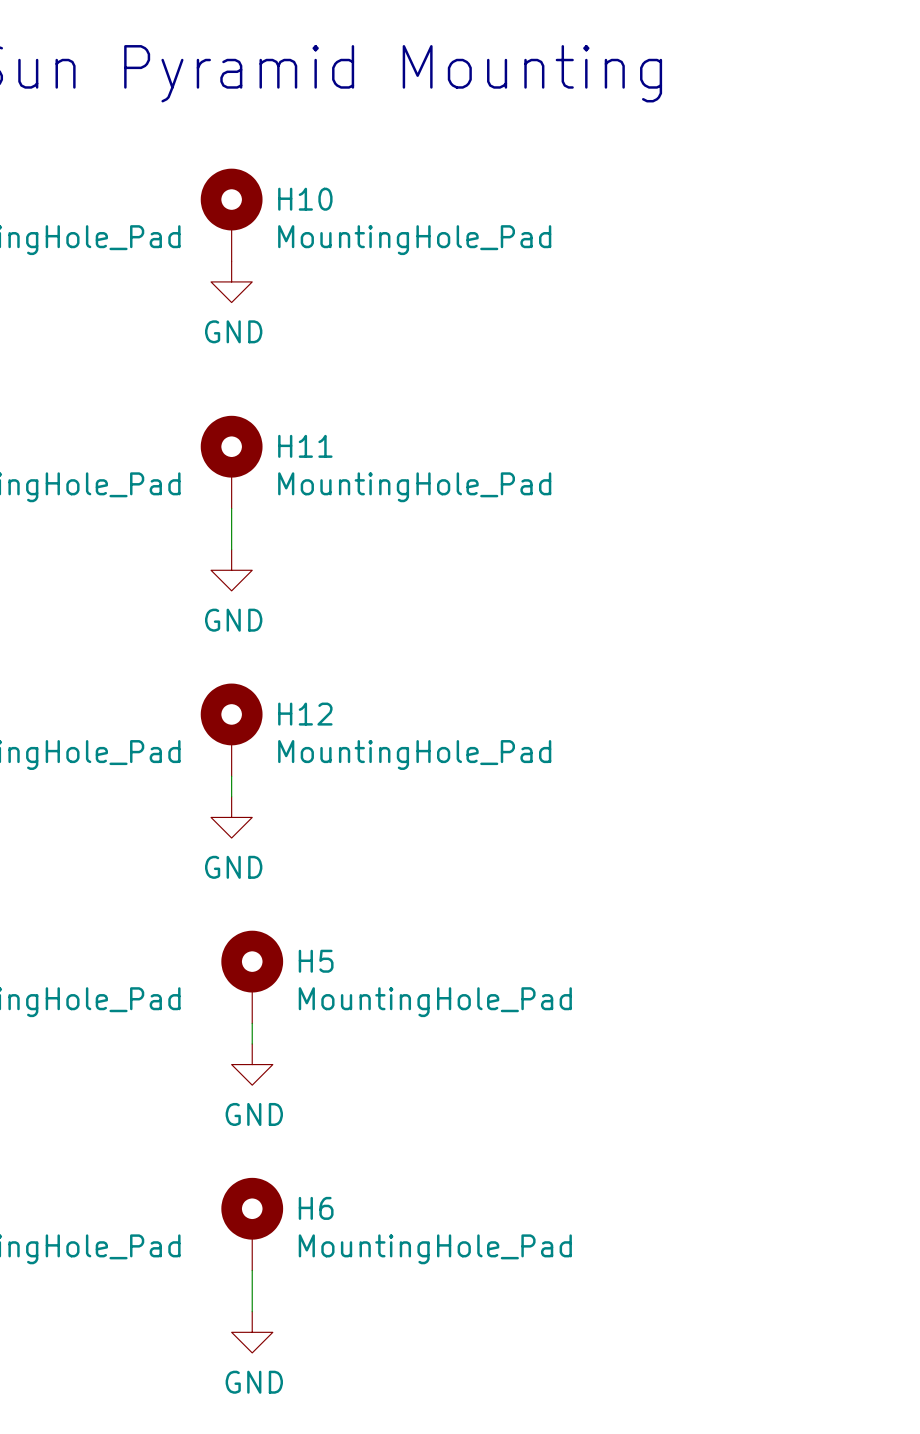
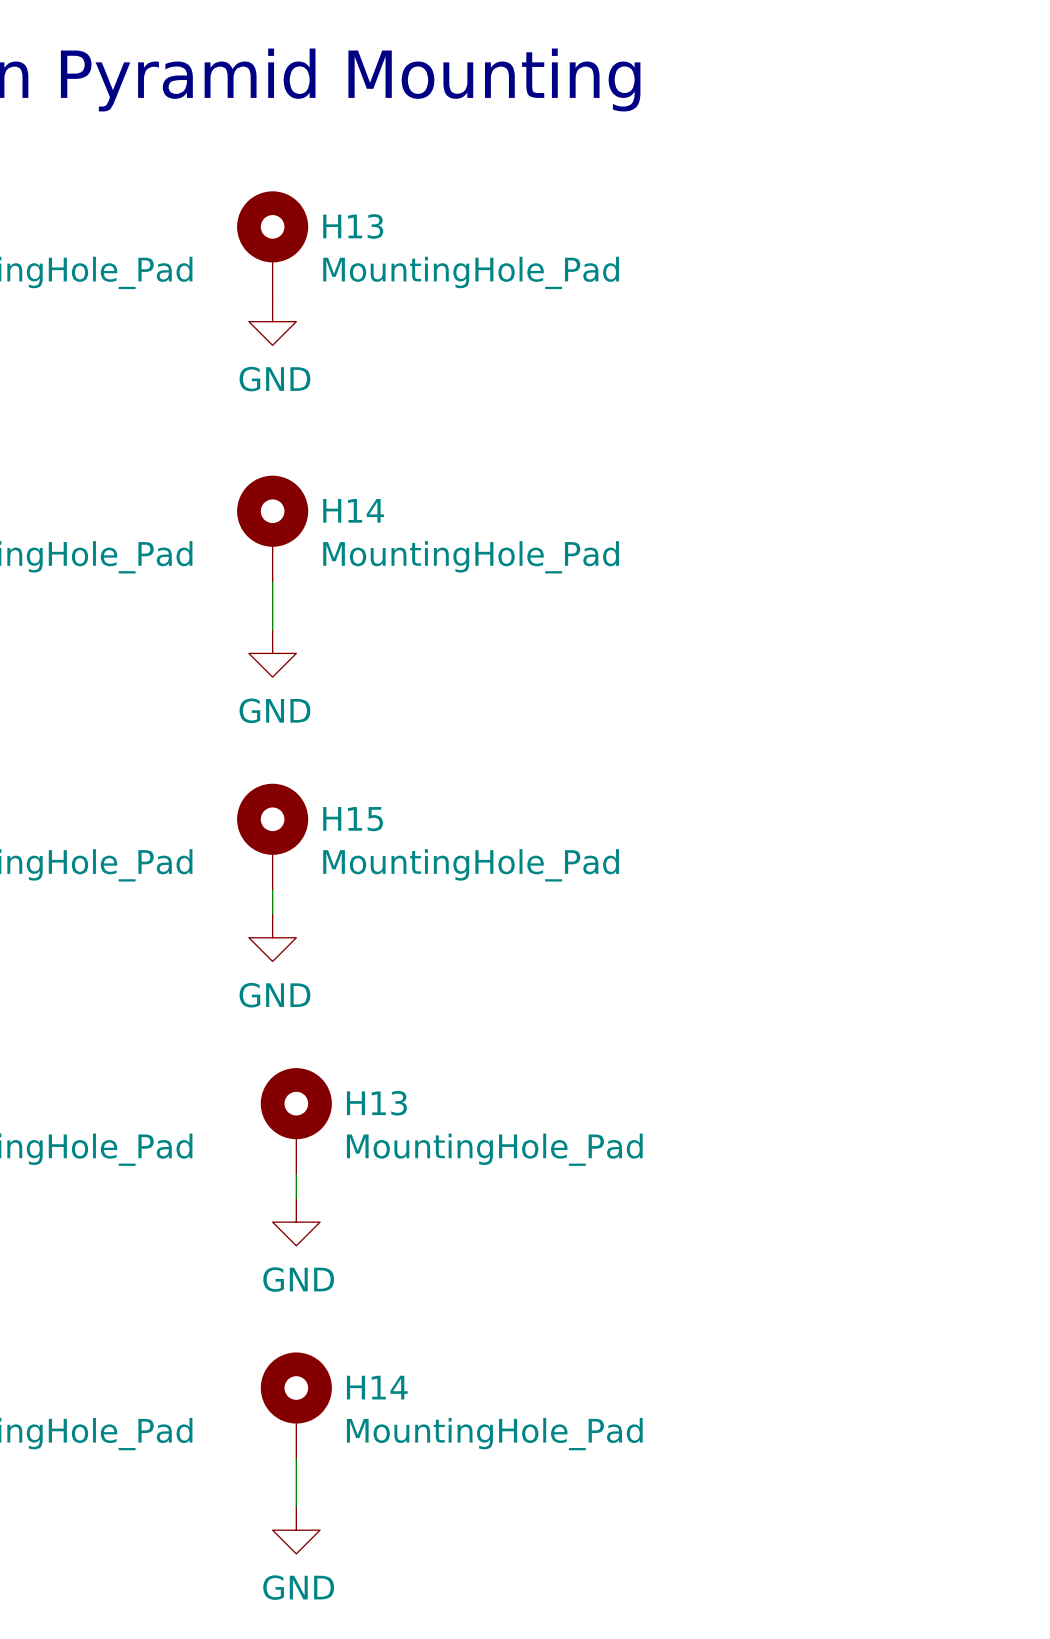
H10 name: H10 (305, 199) -> H13 (353, 226)
H11 name: H11 (305, 446) -> H14 (353, 510)
H12 name: H12 (305, 714) -> H15 (353, 819)
H5 name: H5 (316, 961) -> H13 (376, 1103)
H6 name: H6 (316, 1208) -> H14 (377, 1387)

